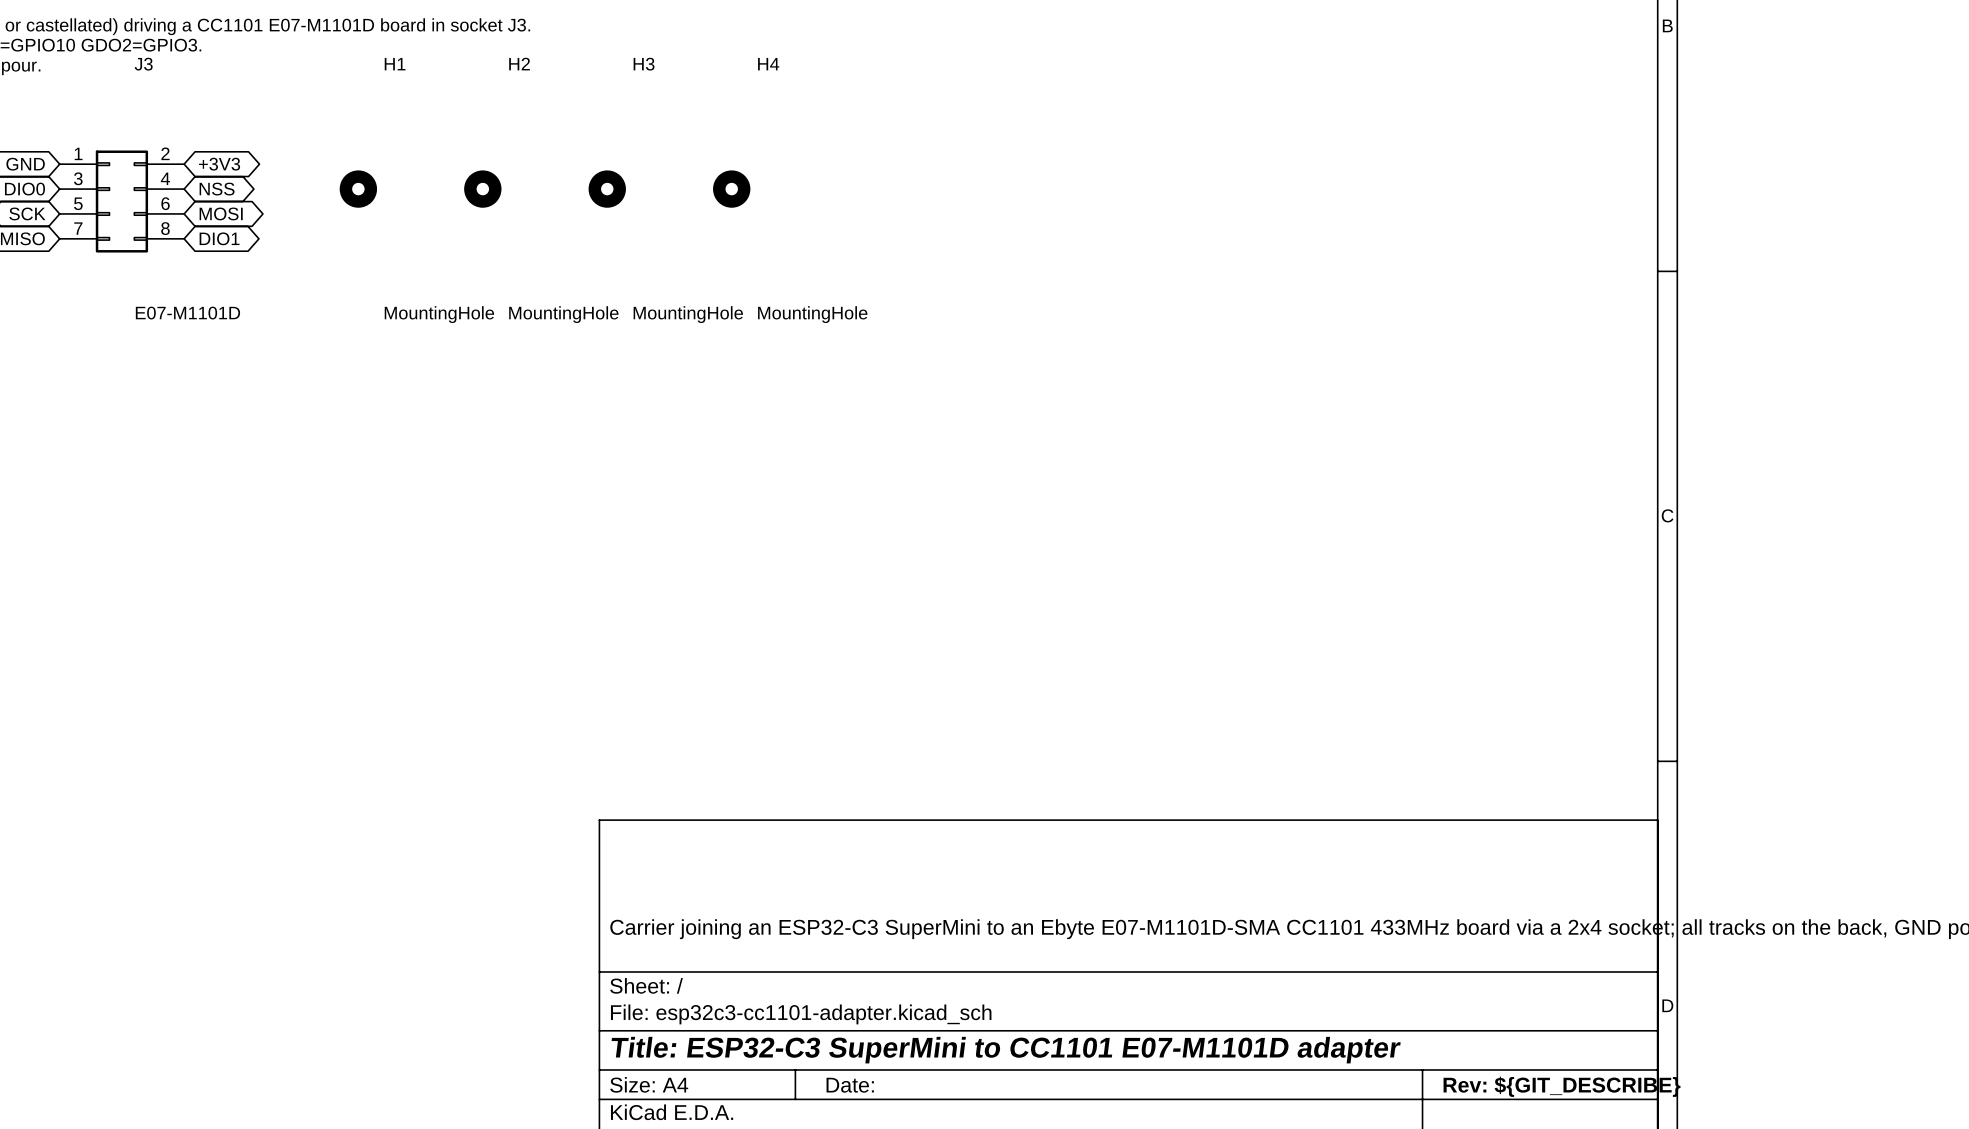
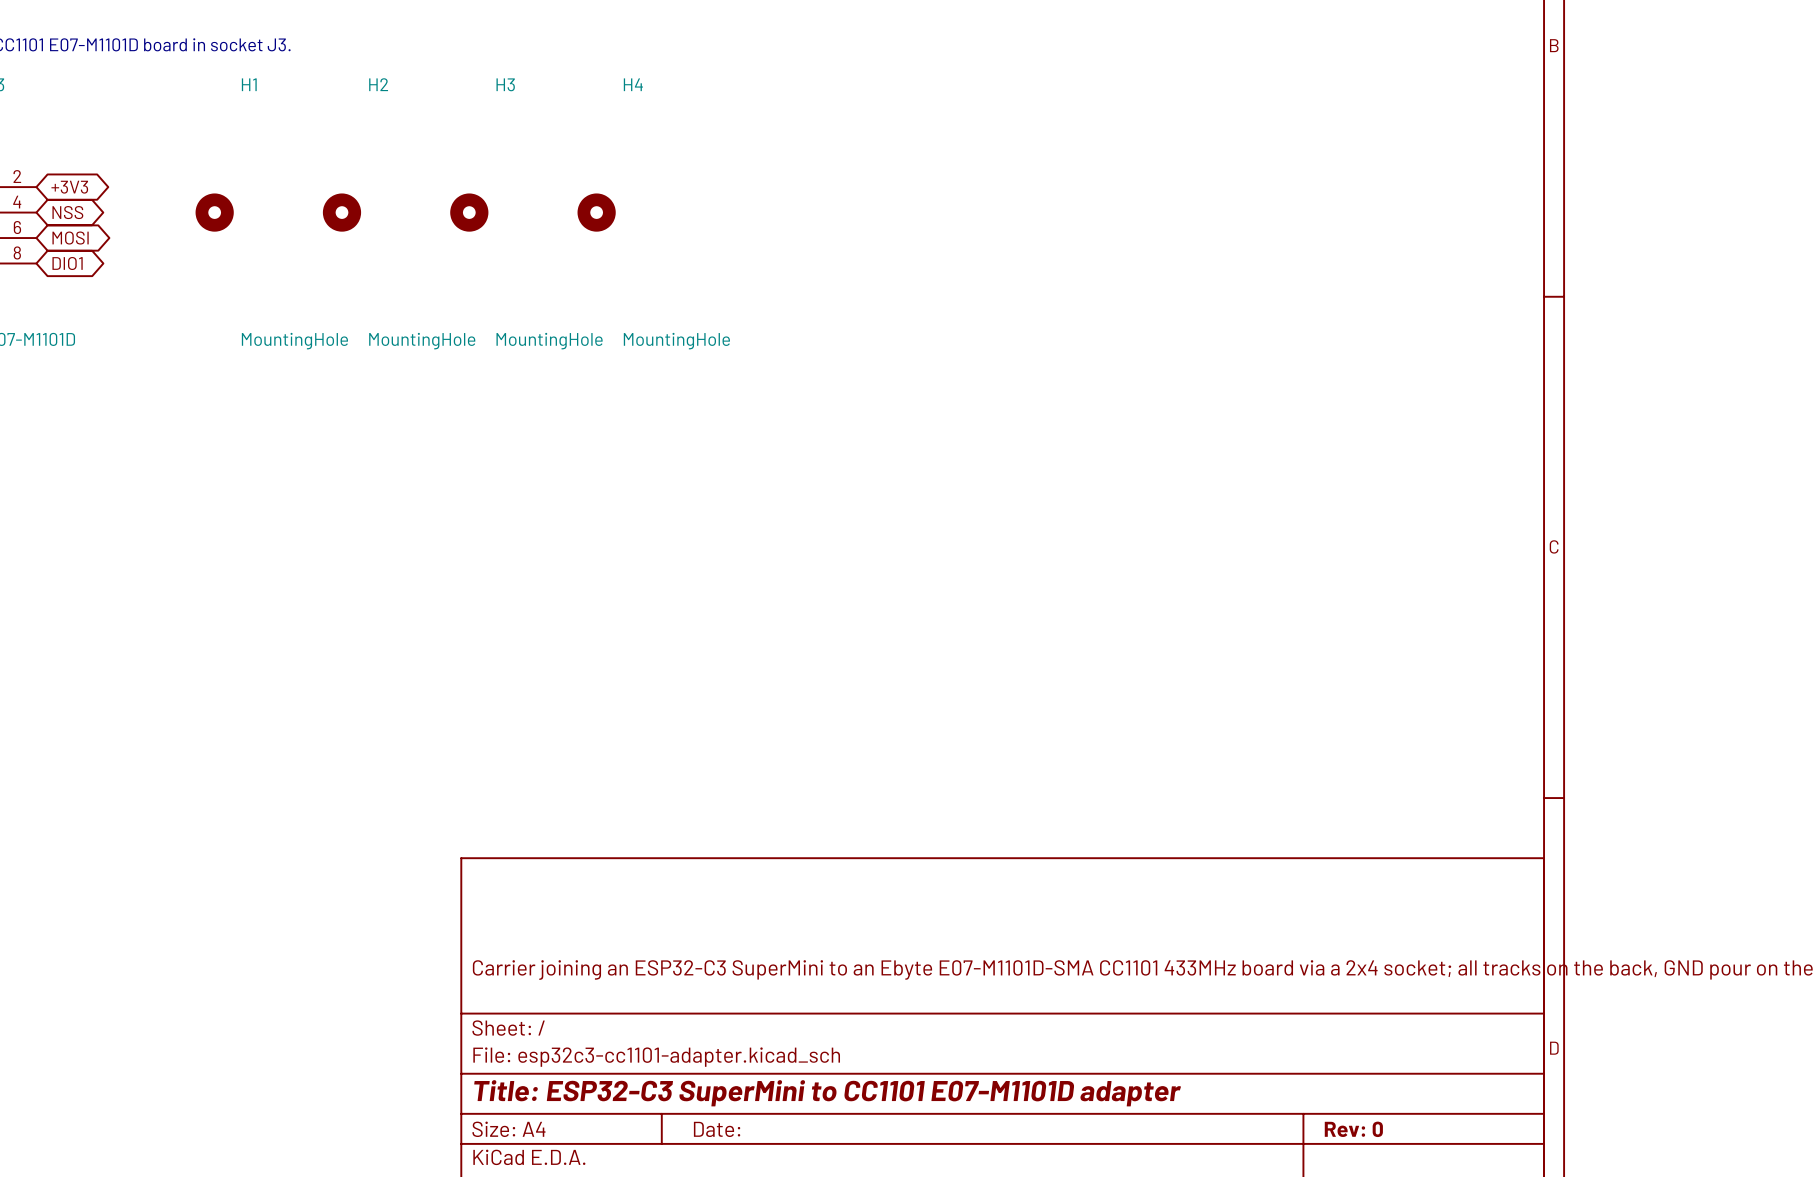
title block: Rev: ${GIT_DESCRIBE} (1562, 1086) -> Rev: 0 (1353, 1129)

